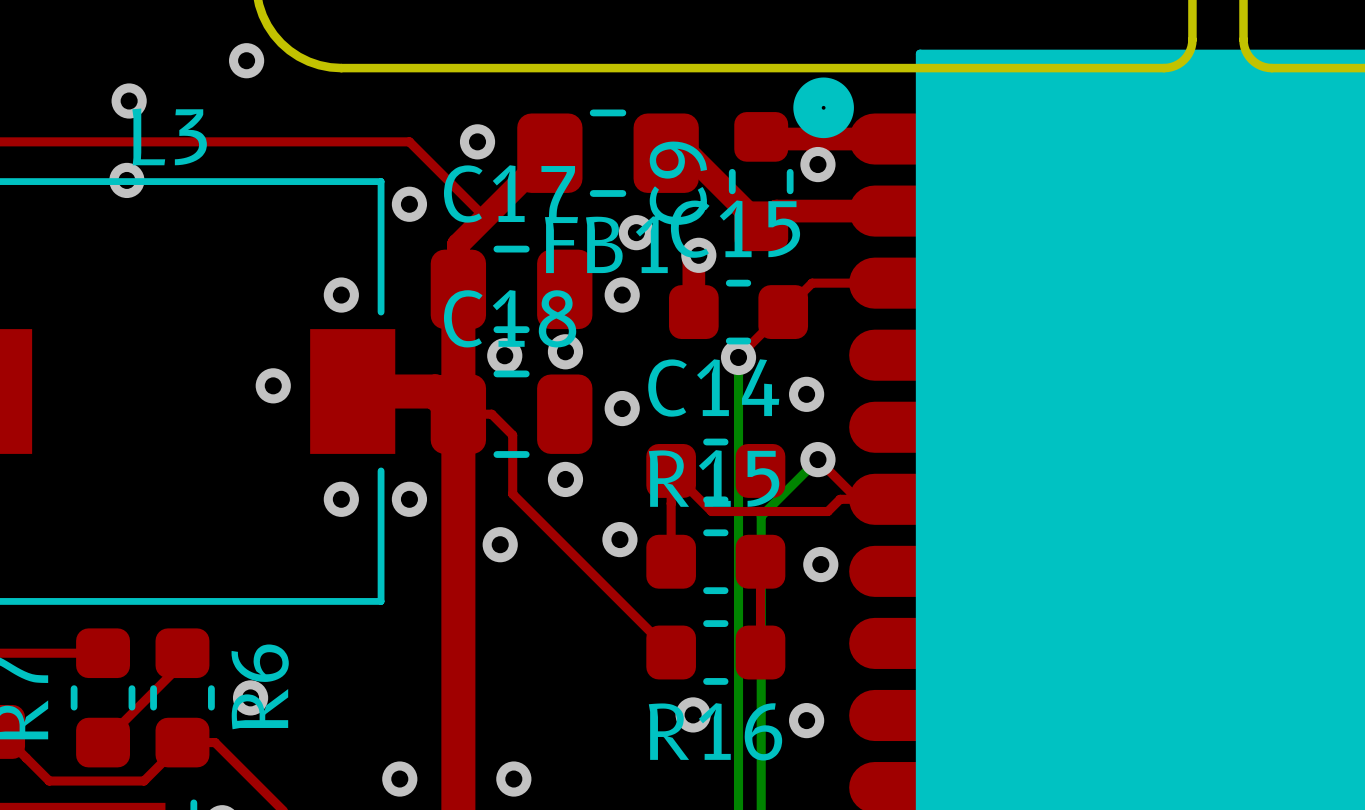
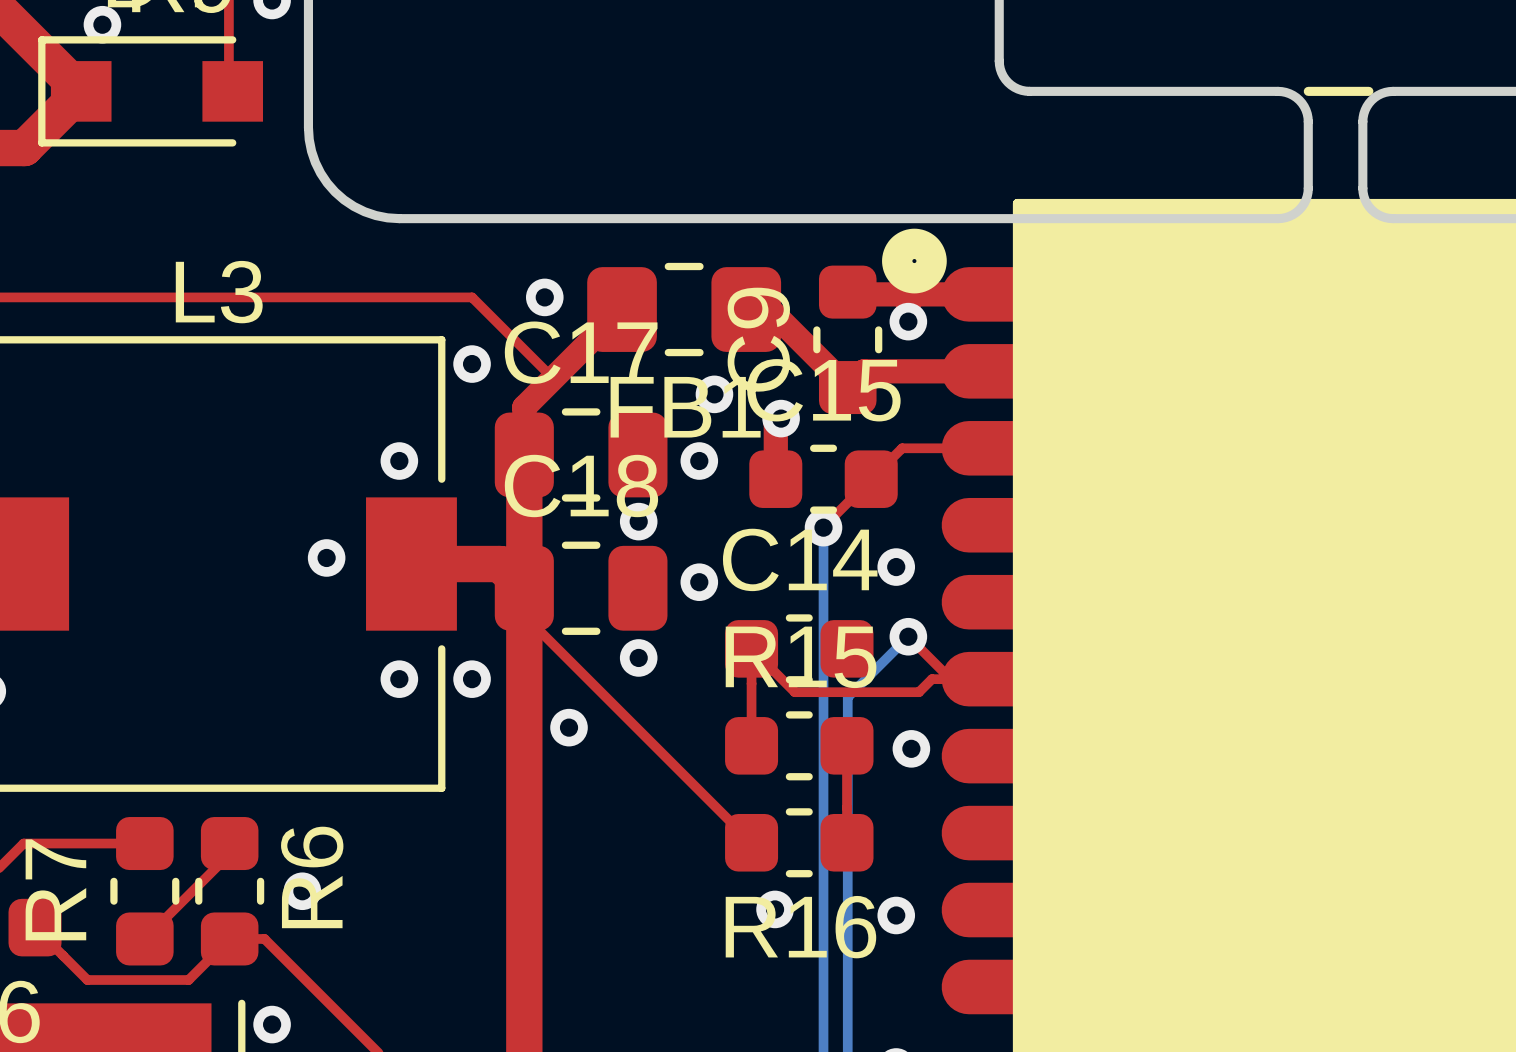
via: (246, 60) -> none
via: (129, 101) -> none
via: (126, 180) -> none
via: (504, 355) -> none
top track: (458, 414) (491, 414) (512, 435) (512, 494) -> (524, 588) (524, 615) (582, 673)
via: (619, 539) -> none
via: (399, 779) -> none
via: (513, 779) -> none

